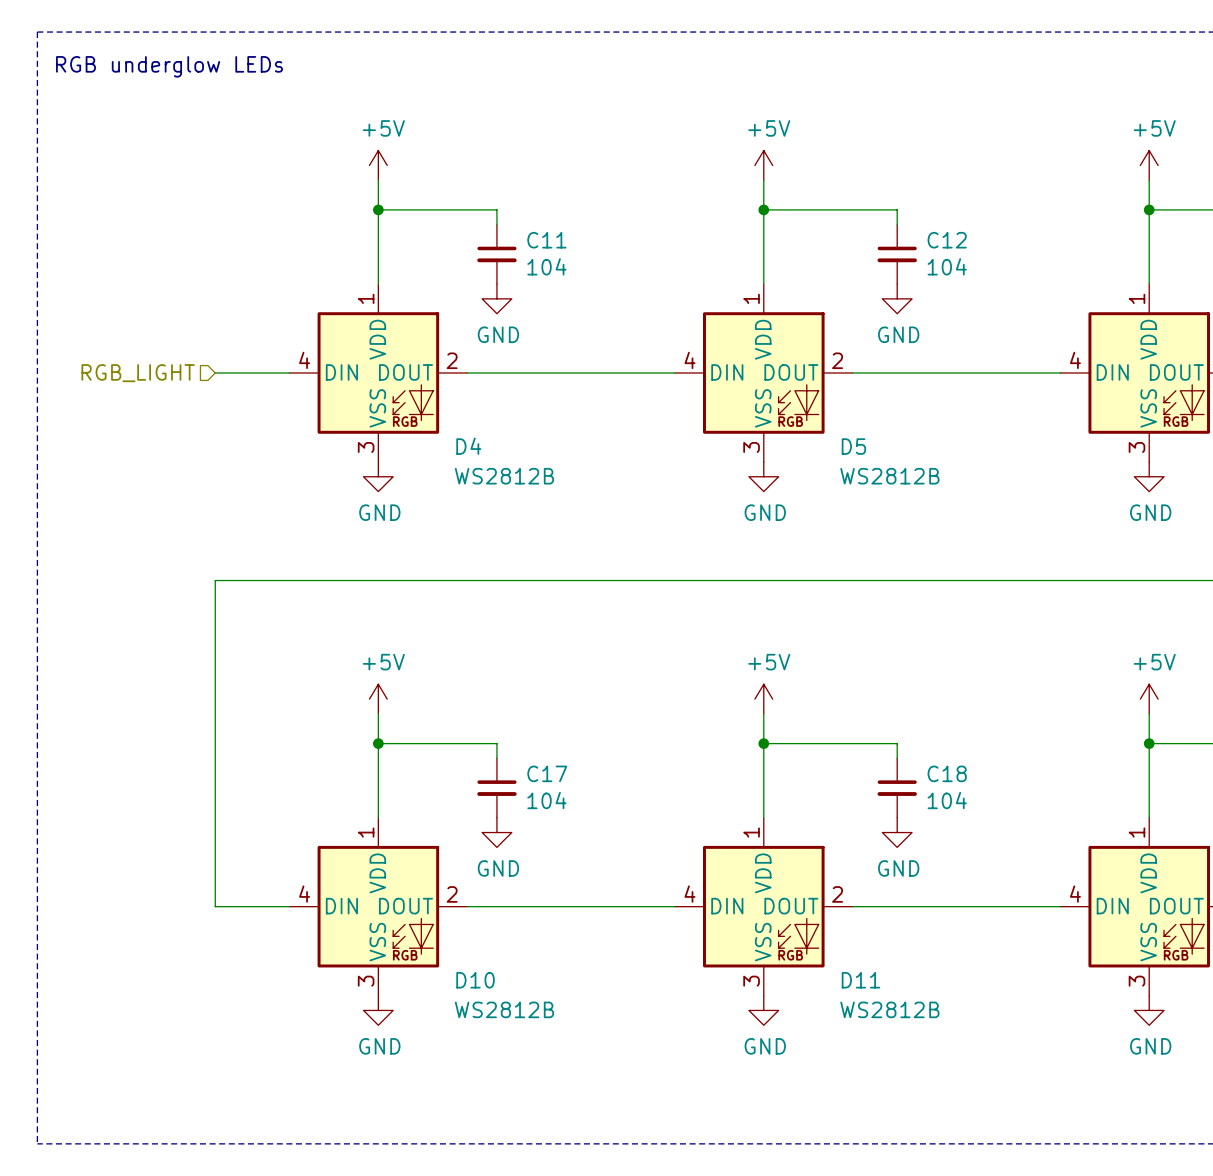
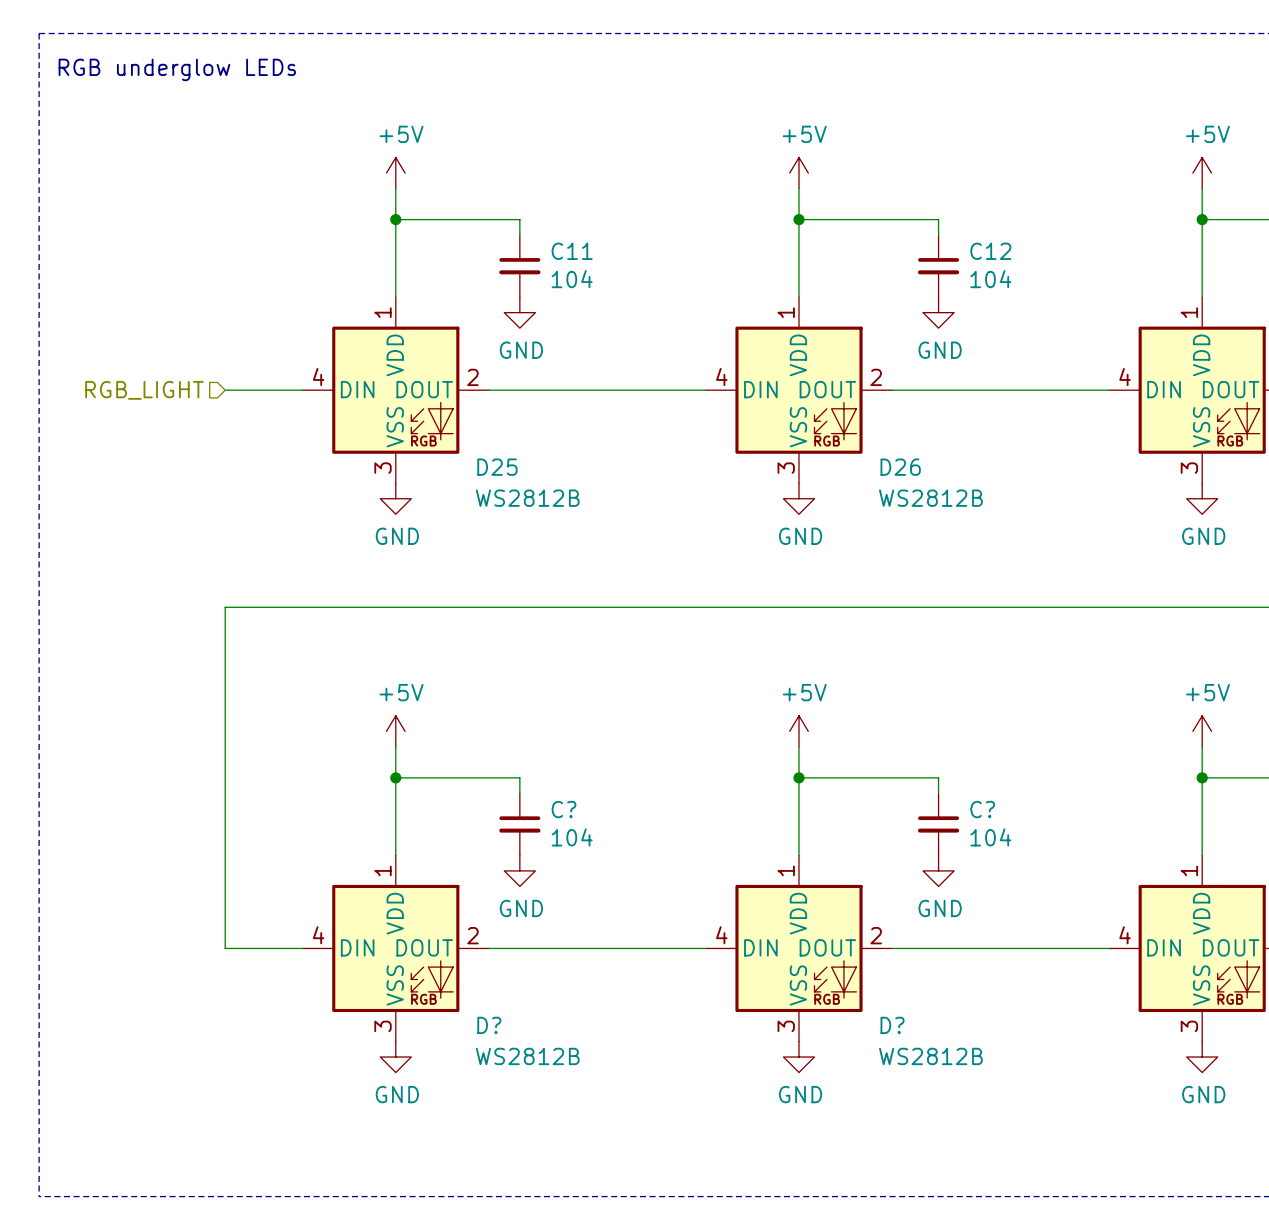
D4 name: D4 (468, 446) -> D25 (497, 467)
D5 name: D5 (853, 446) -> D26 (900, 467)
C17 name: C17 (547, 773) -> C? (564, 809)
C18 name: C18 (947, 773) -> C? (982, 809)
D10 name: D10 (475, 980) -> D? (489, 1025)
D11 name: D11 (860, 980) -> D? (892, 1025)

